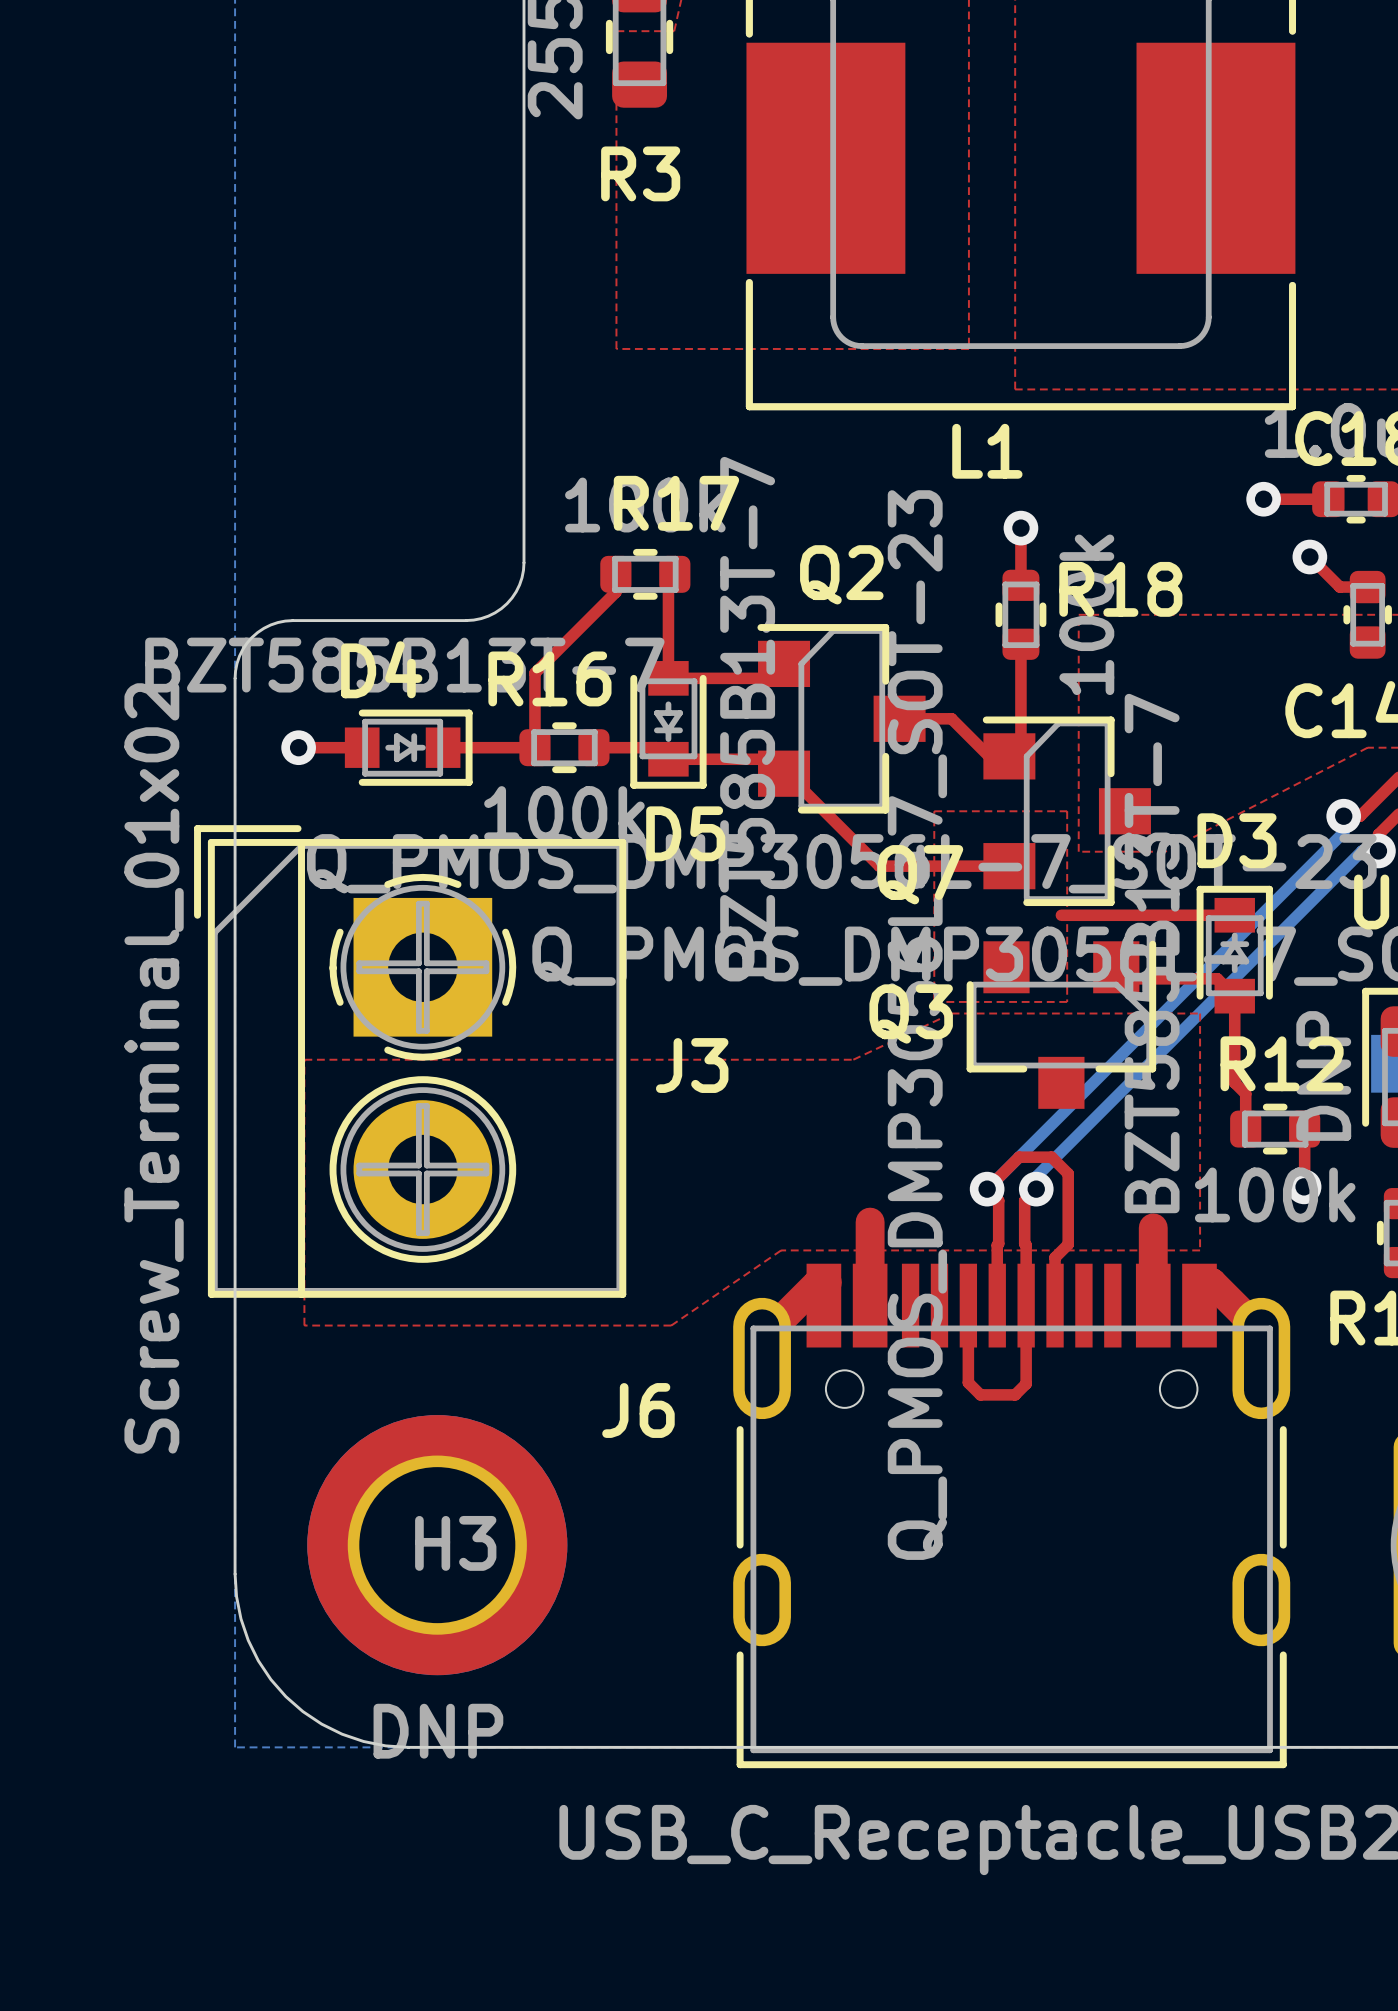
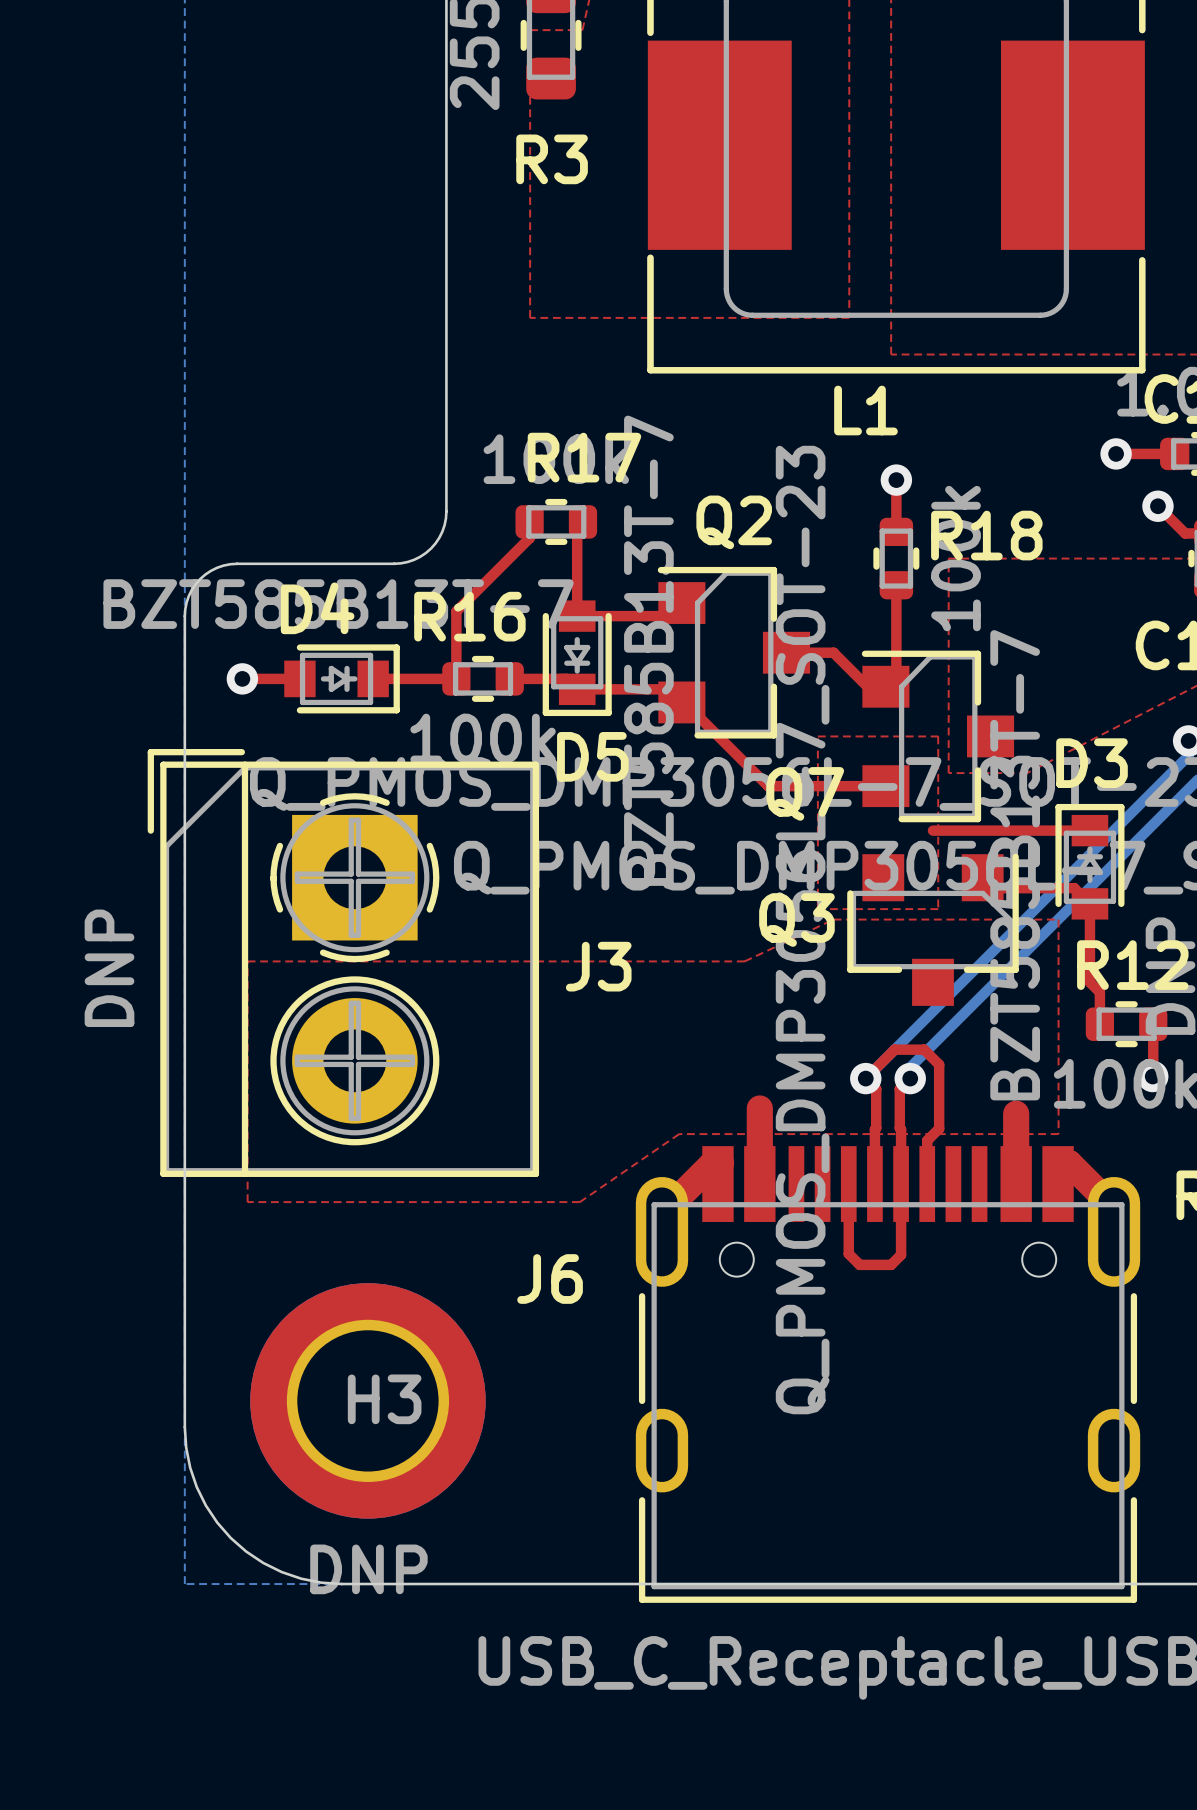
J3 value: Screw_Terminal_01x02 (154, 1068) -> DNP (109, 968)

